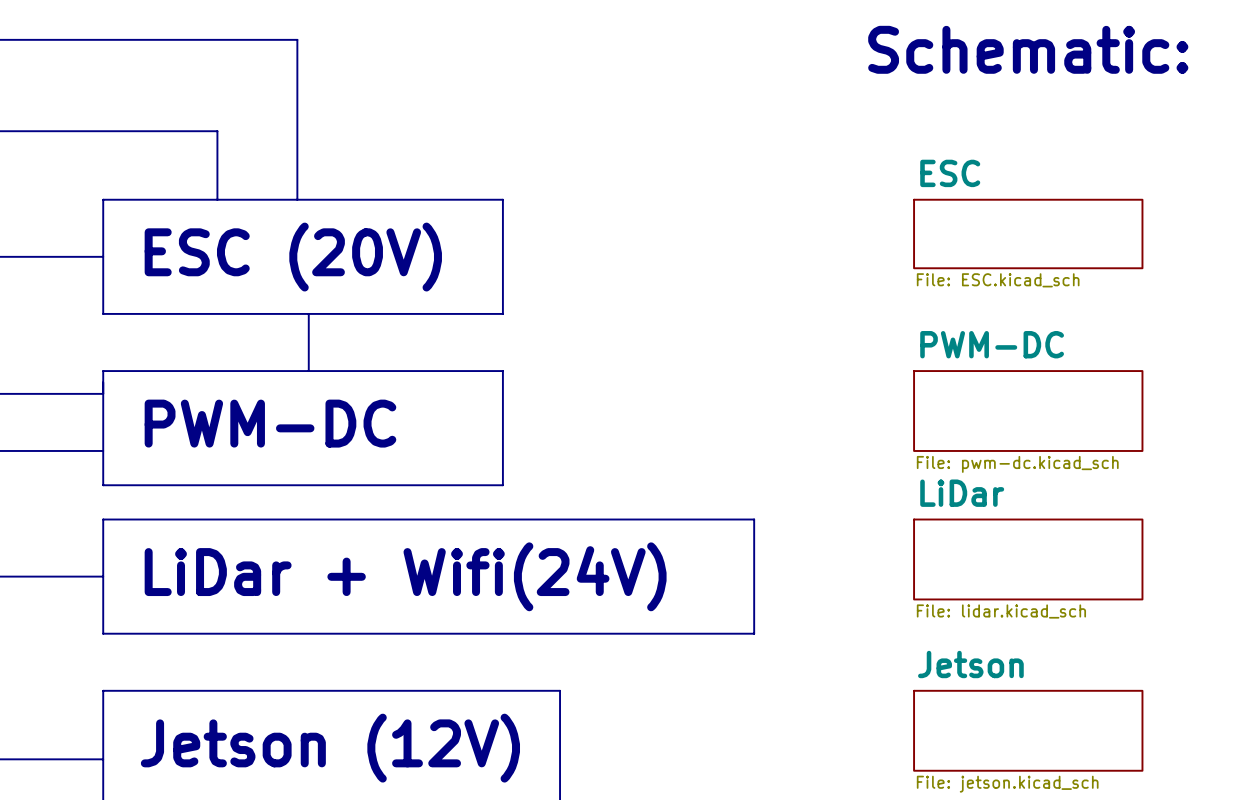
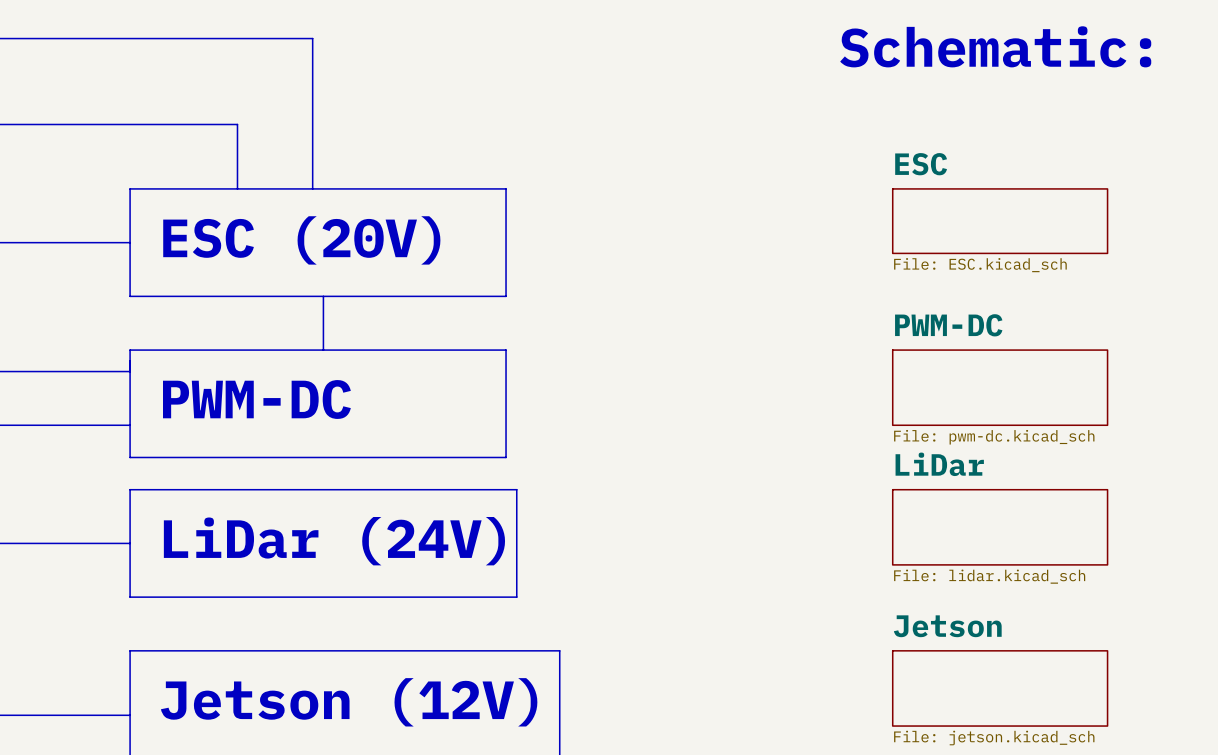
line: (514, 519) (754, 519) (754, 633) (514, 633) -> (516, 489) (516, 597)
text: LiDar + Wifi(24V) (405, 576) -> LiDar (24V) (334, 541)

